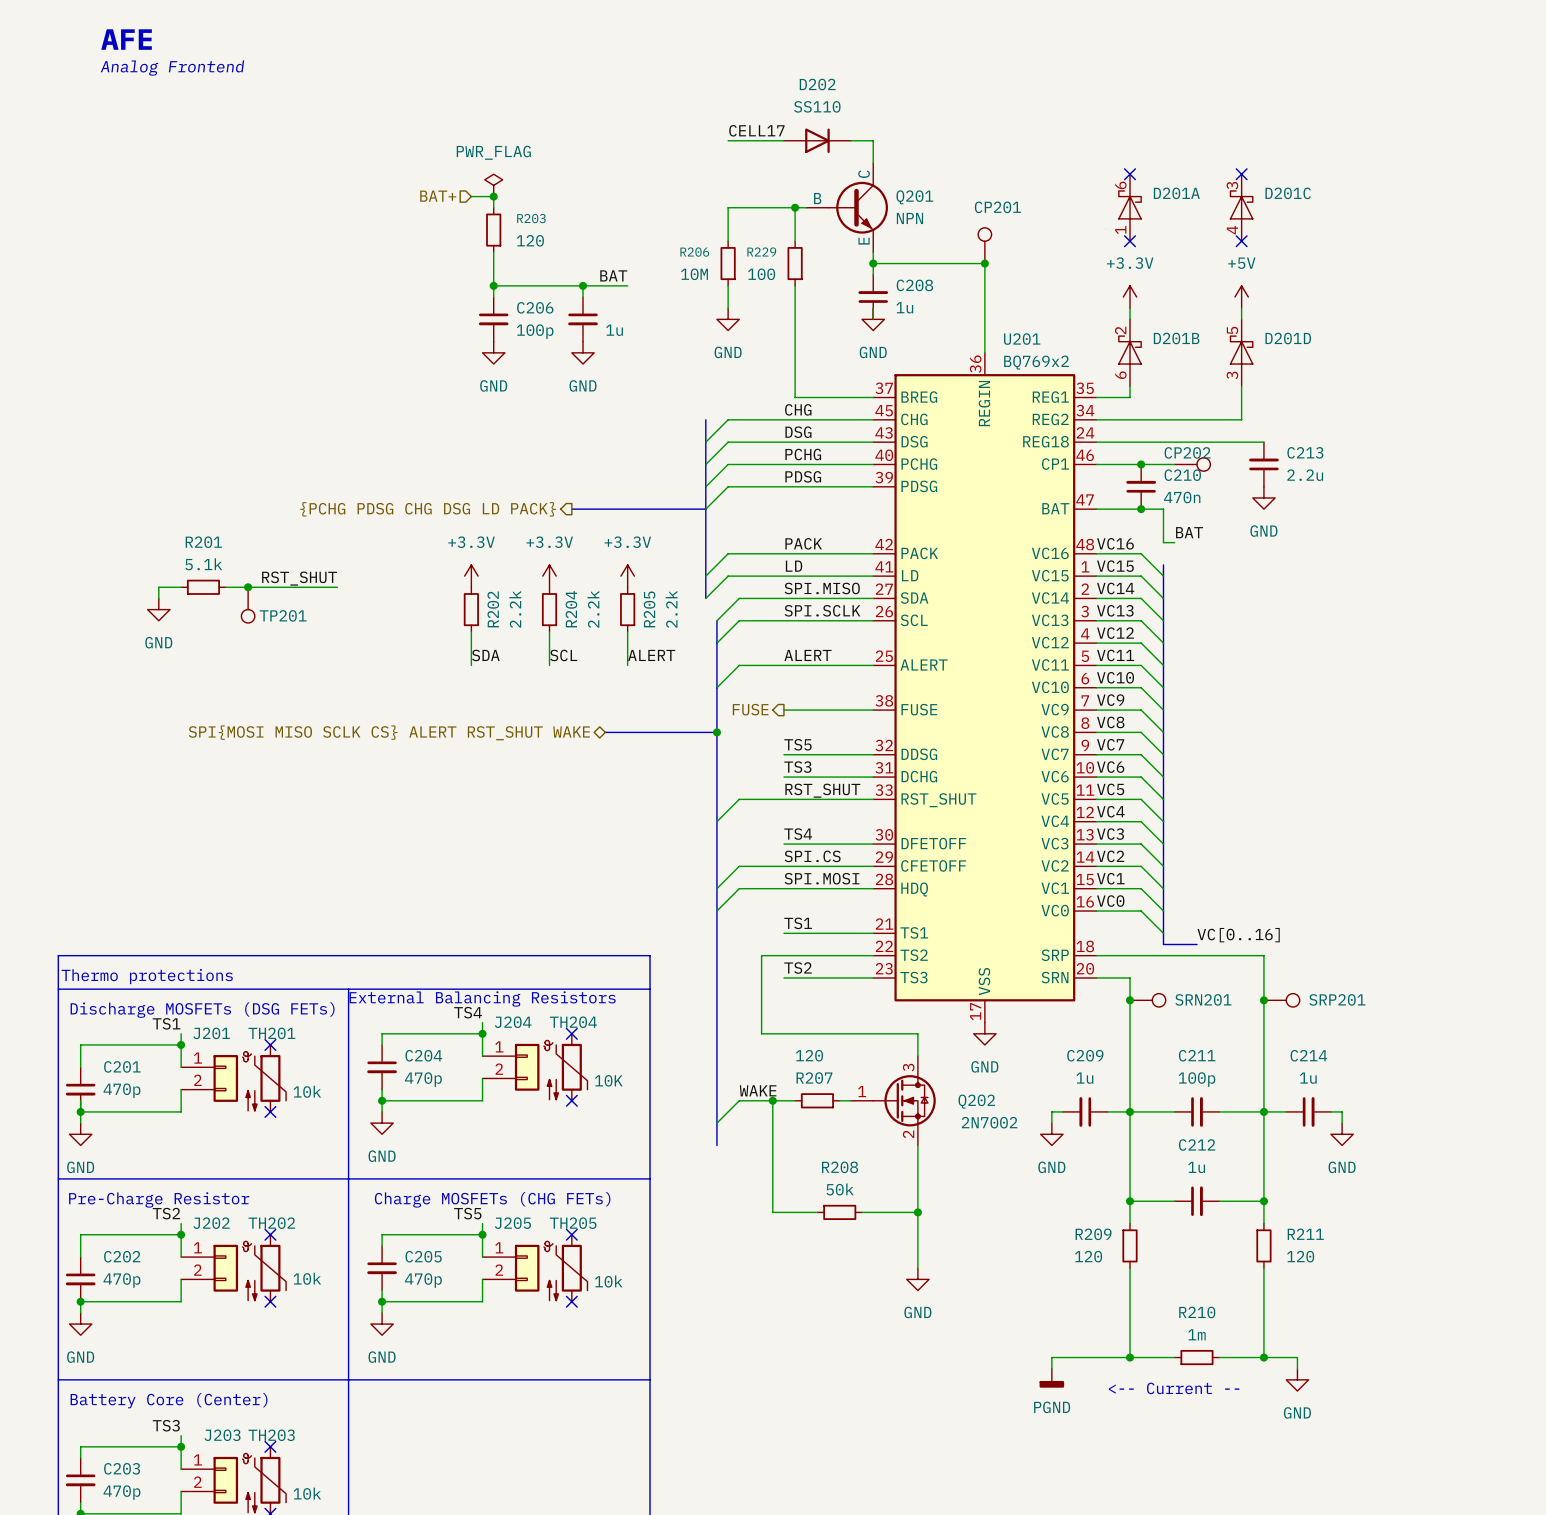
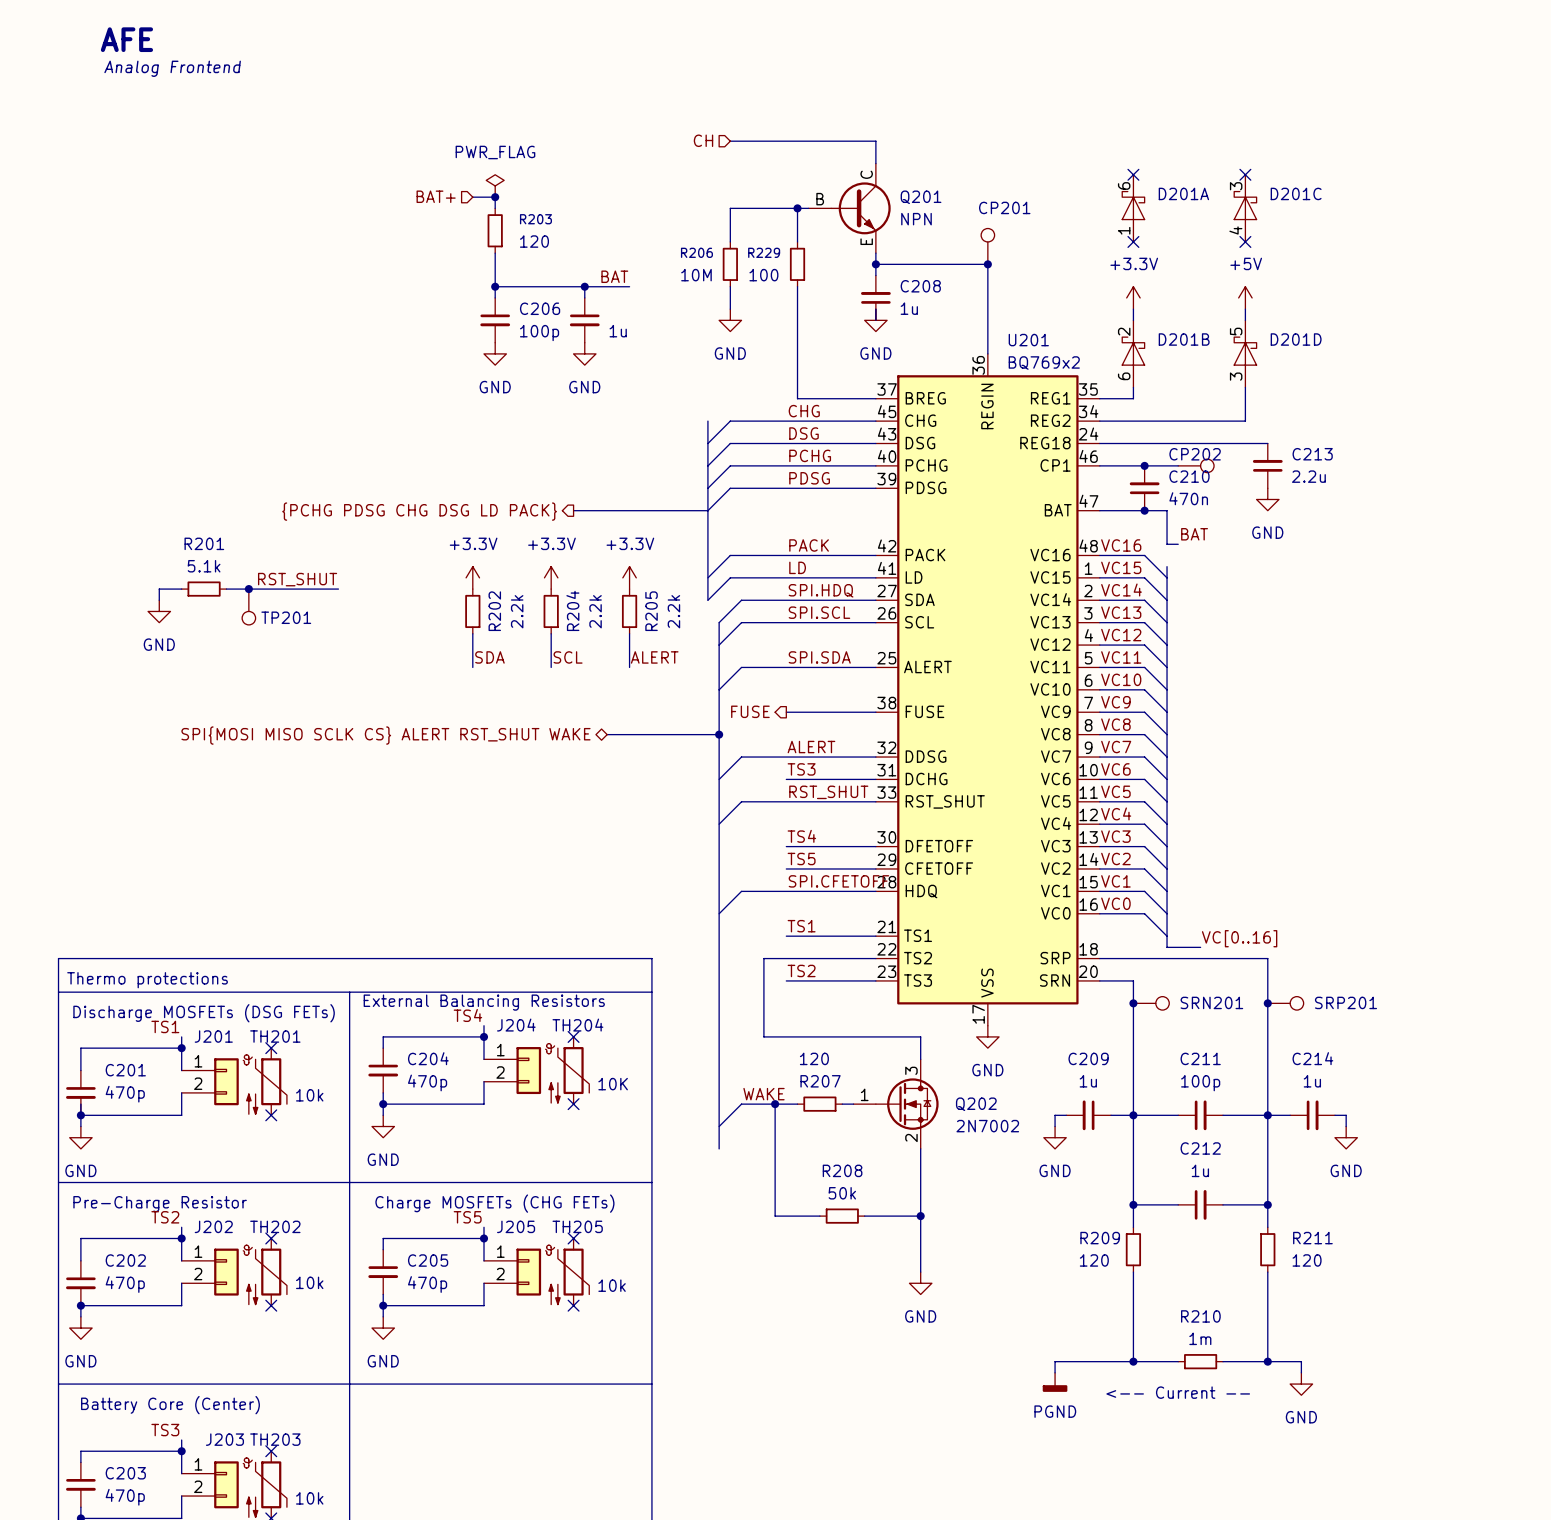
label: CELL17 (756, 130) -> none
hierarchical label: none -> CH (703, 140)
D202: SS110 (817, 140) -> none
label: SPI.MISO (822, 588) -> SPI.HDQ (821, 590)
label: SPI.SCLK (822, 610) -> SPI.SCL (819, 612)
label: ALERT (807, 655) -> SPI.SDA (819, 657)
label: TS5 (797, 744) -> ALERT (811, 747)
label: SPI.CS (812, 856) -> TS5 (801, 859)
wire: (783, 866) (739, 866) (716, 888) -> (786, 757) (741, 757) (719, 779)
label: SPI.MOSI (822, 878) -> SPI.CFETOFF (838, 881)

